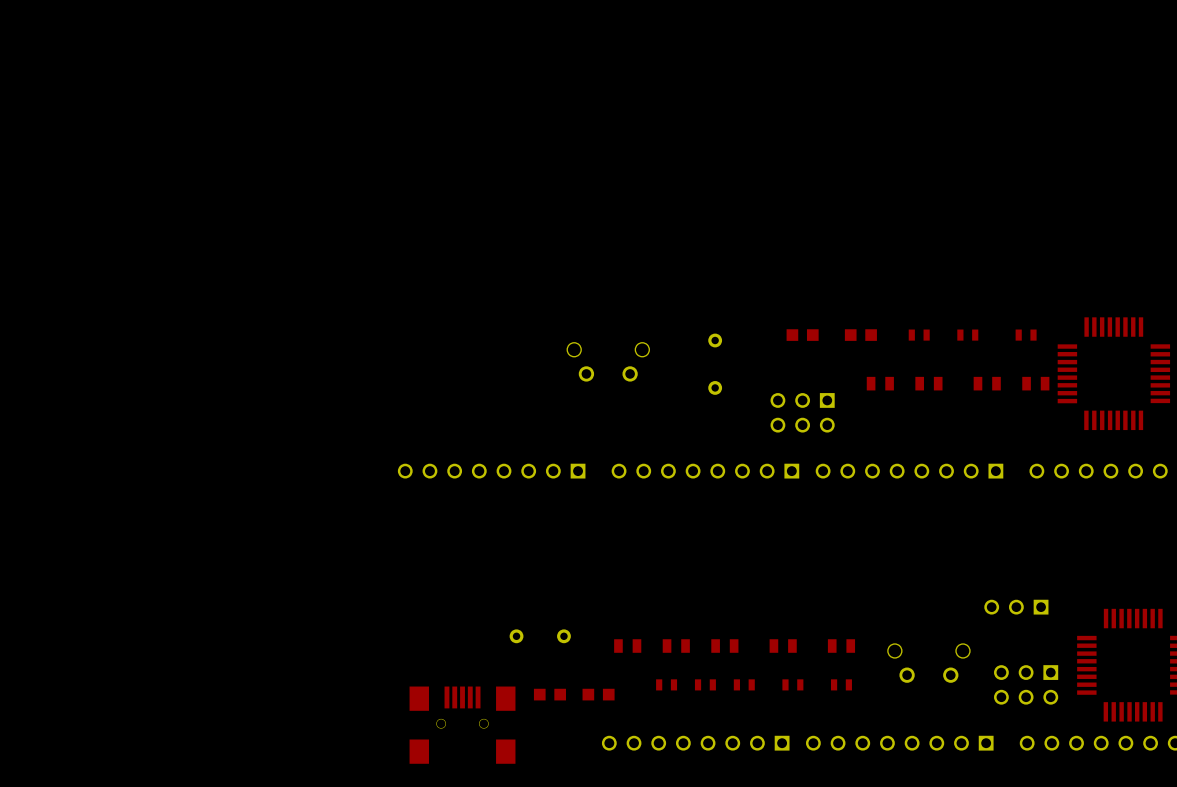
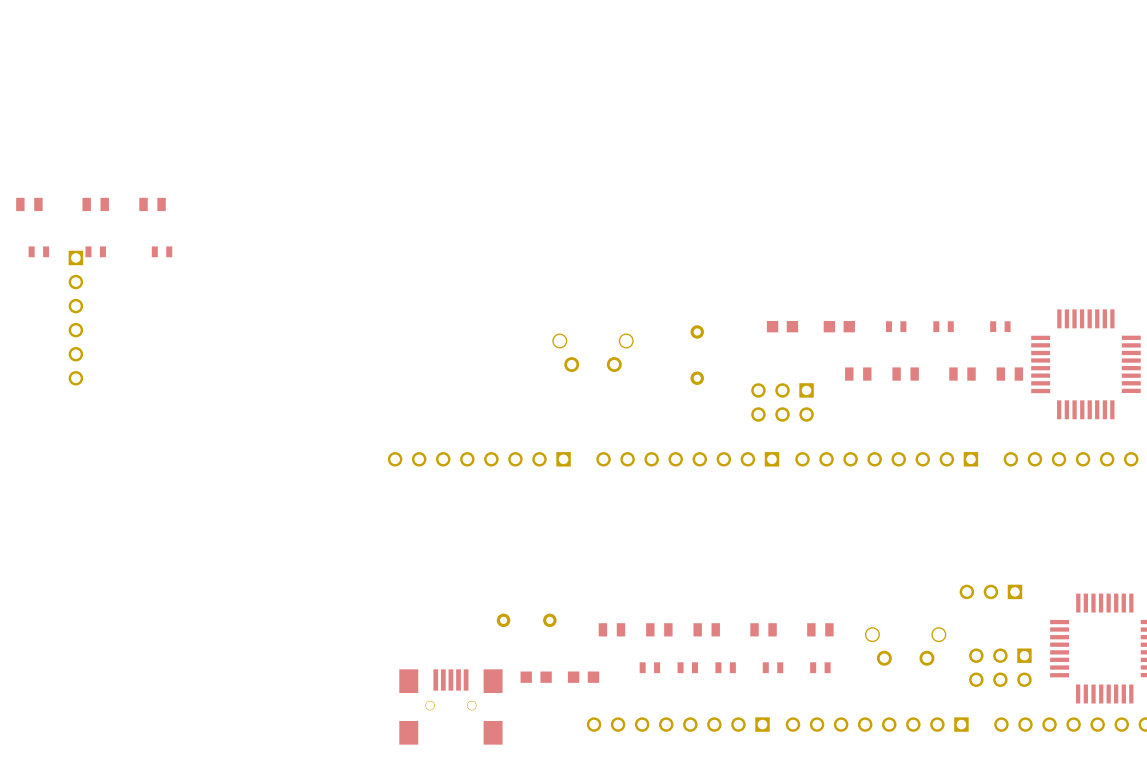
part: none -> (29, 204)
part: none -> (95, 204)
part: none -> (152, 204)
part: none -> (38, 251)
part: none -> (95, 251)
part: none -> (162, 251)
part: none -> (75, 318)

